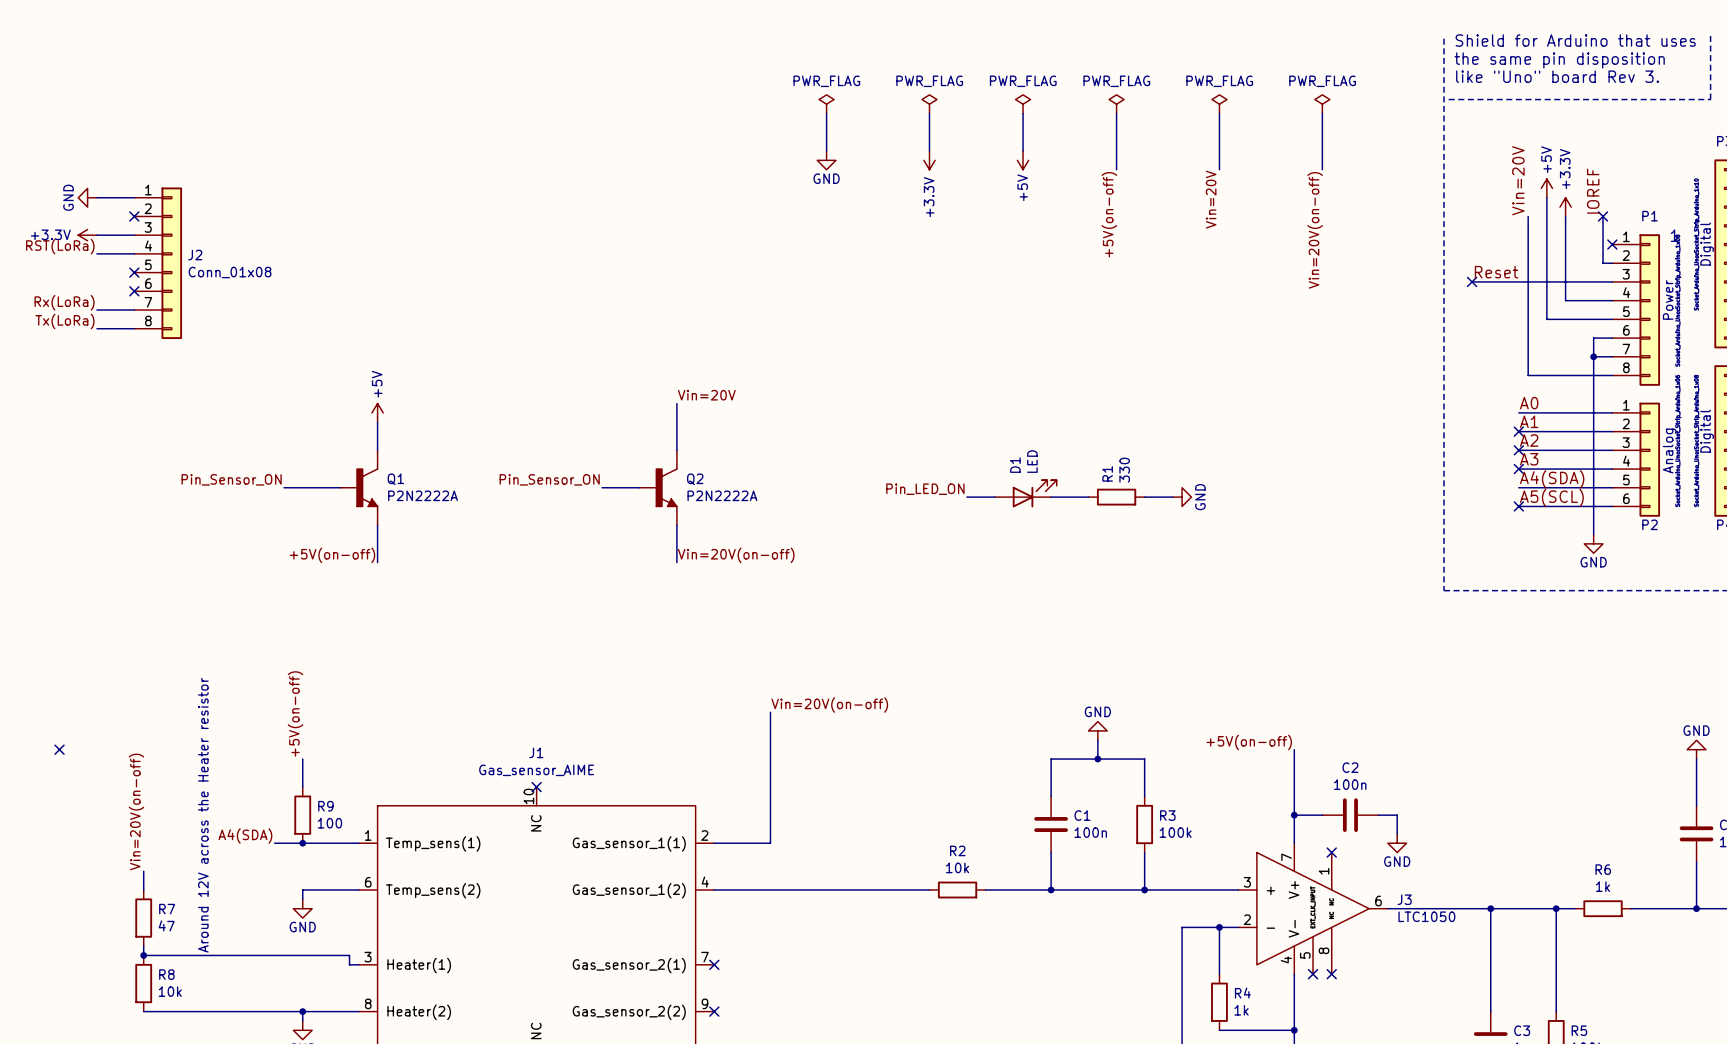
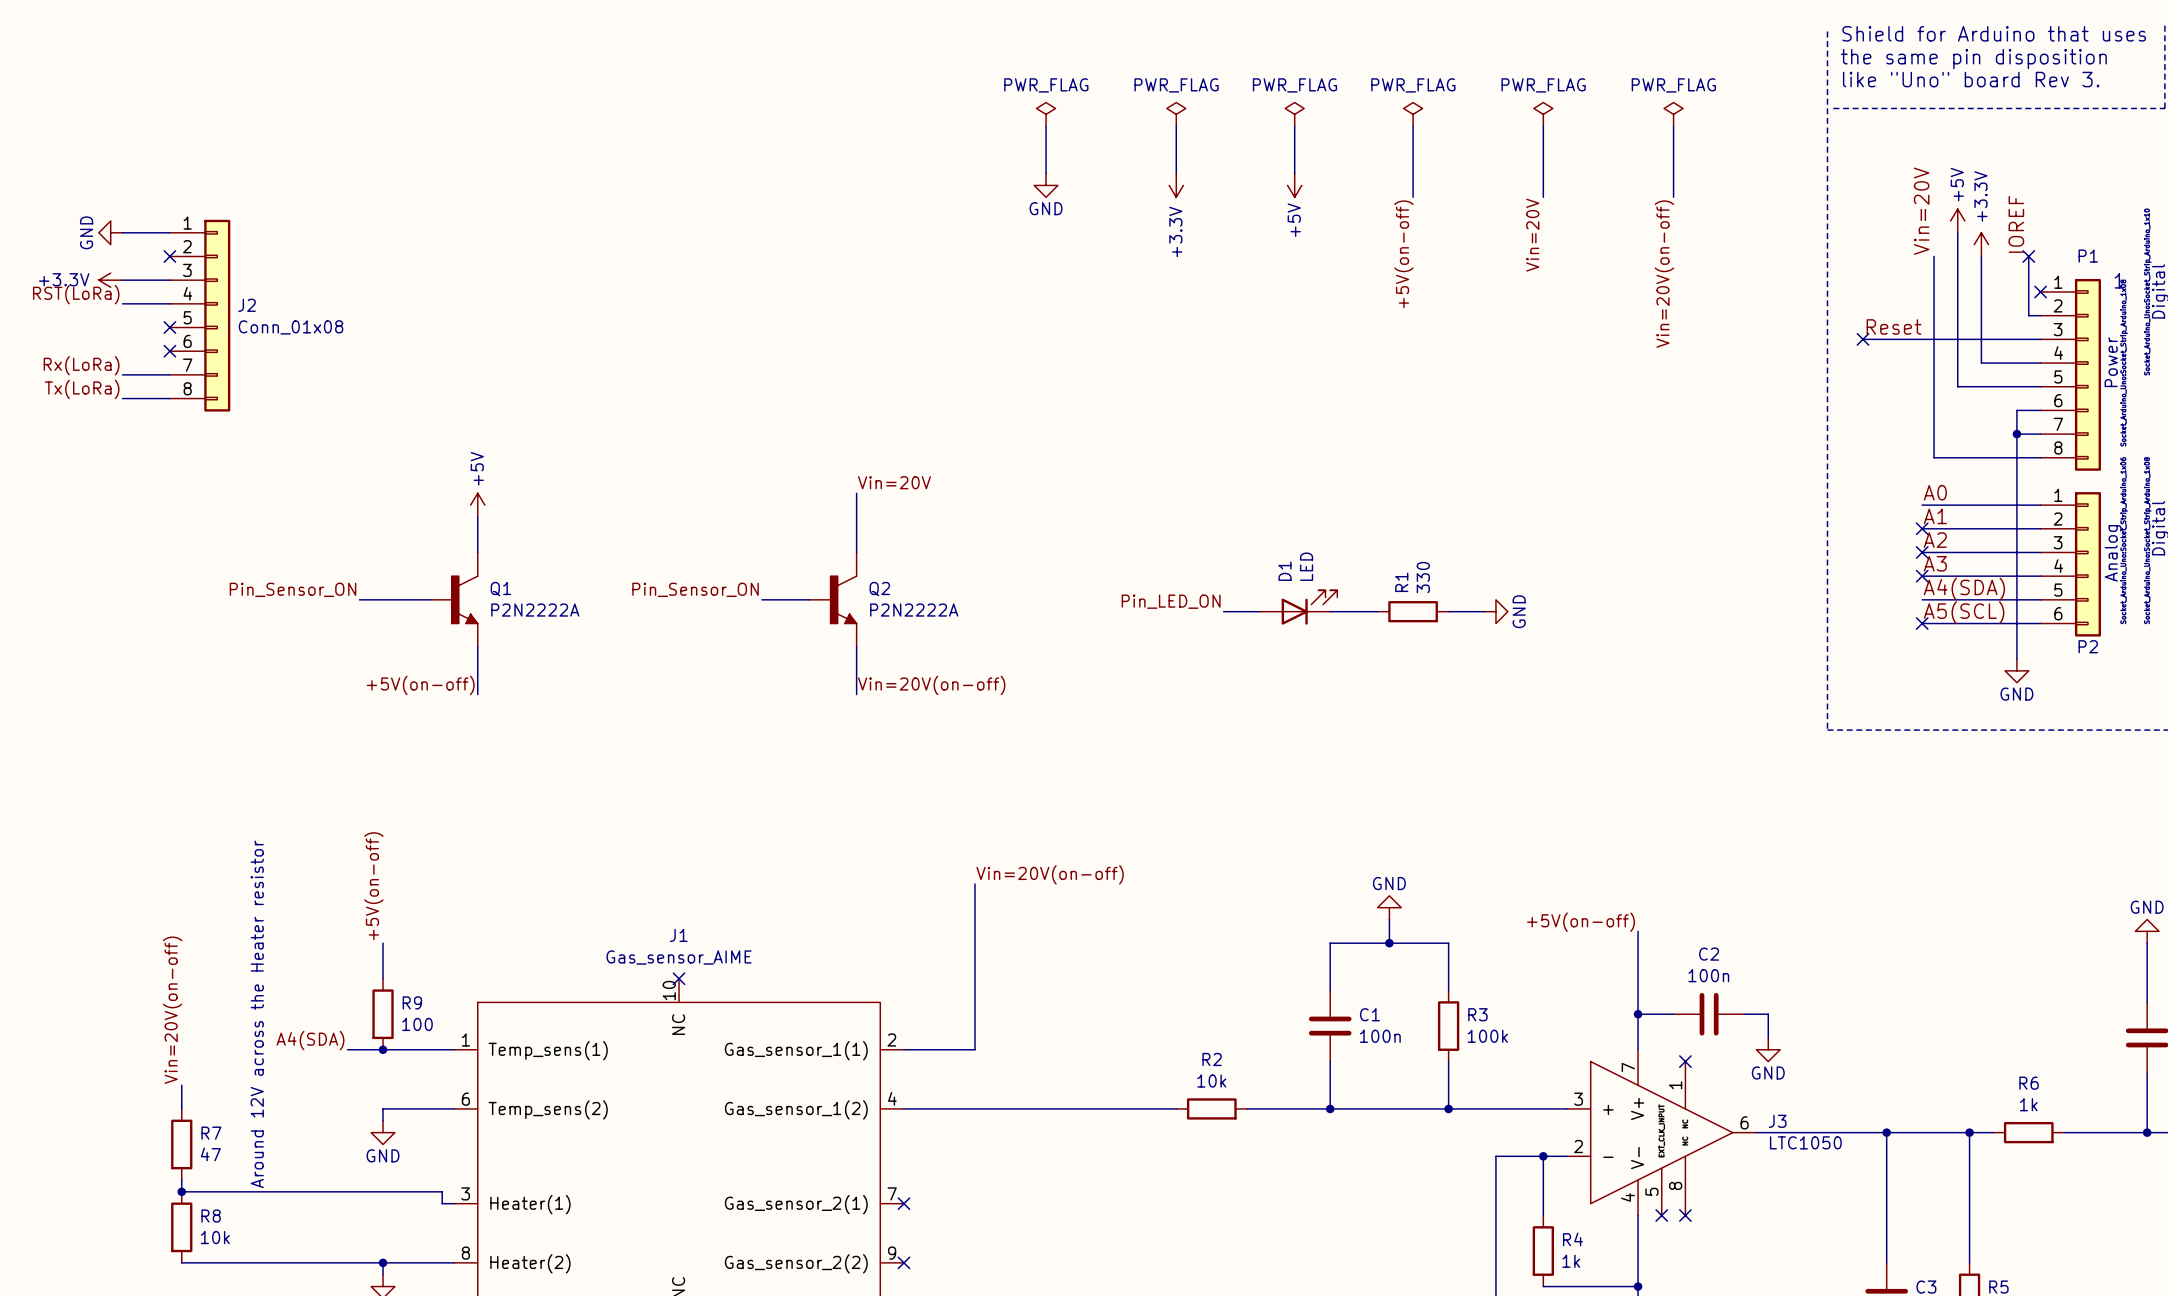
no-connect mark: (59, 749) -> none

